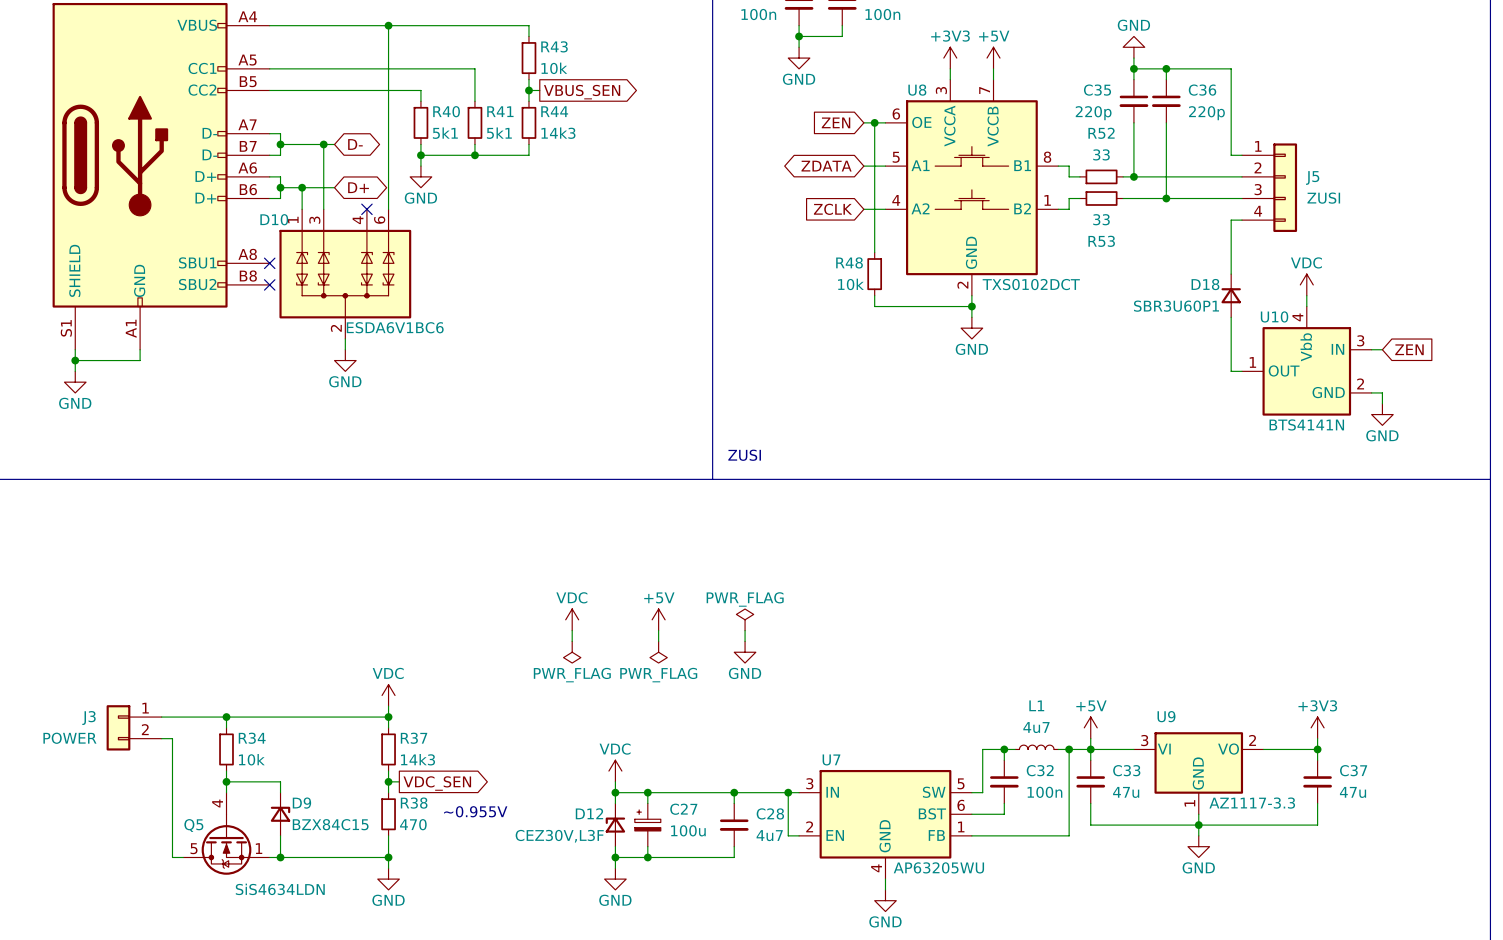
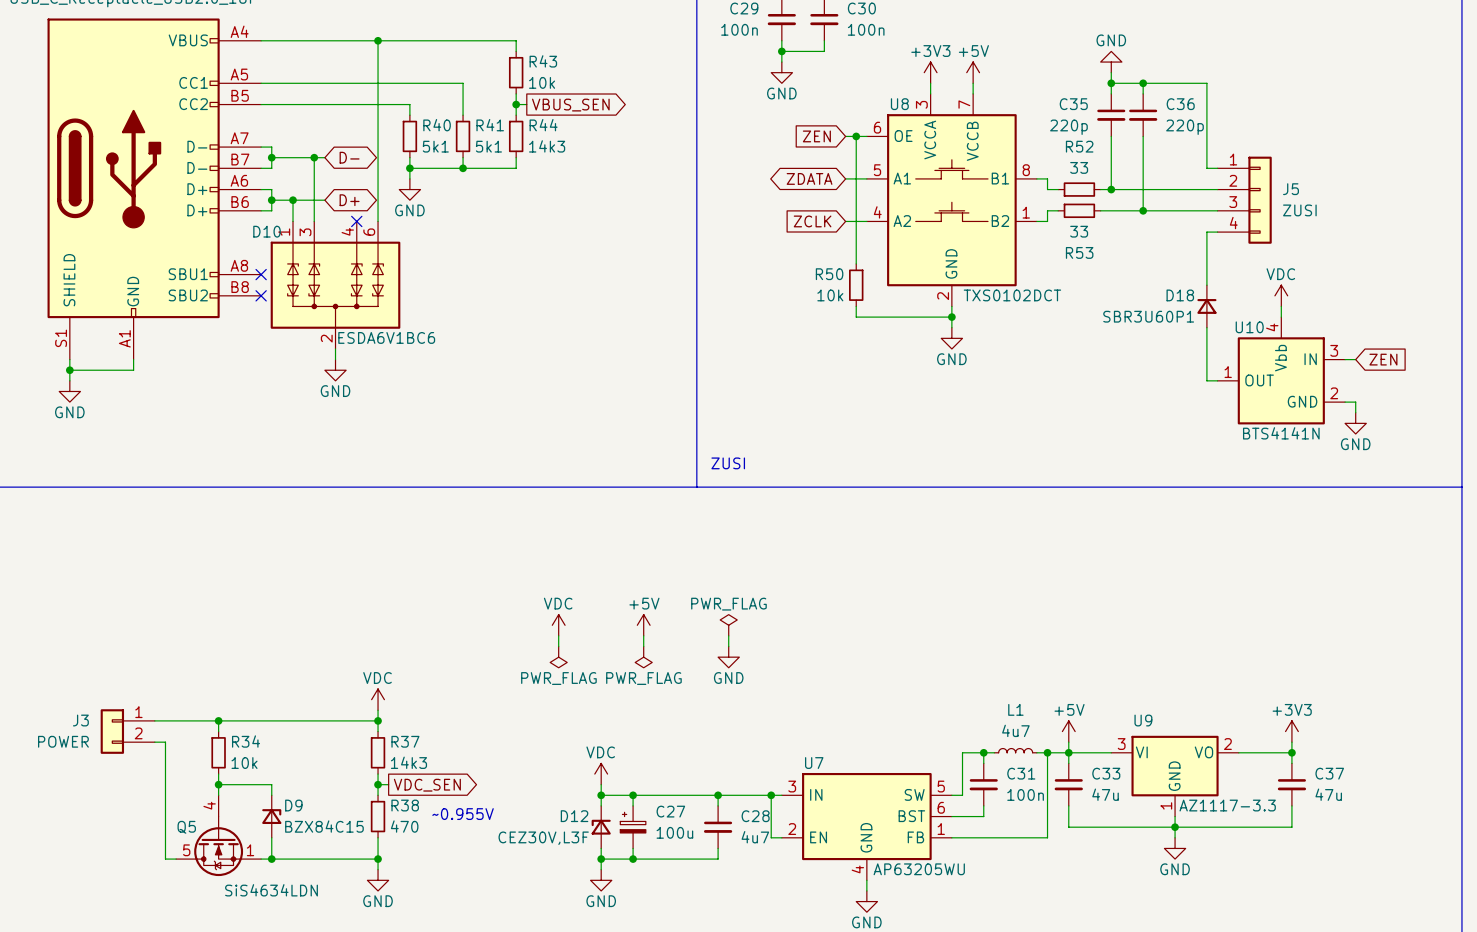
R48 name: R48 (849, 262) -> R50 (829, 274)
C32 name: C32 (1040, 770) -> C31 (1021, 773)

